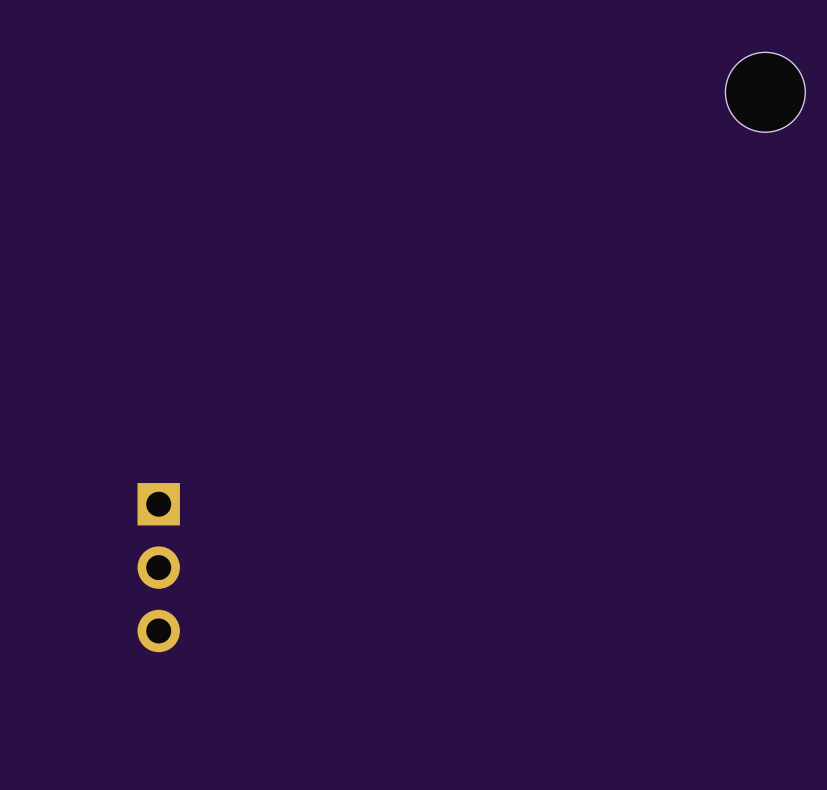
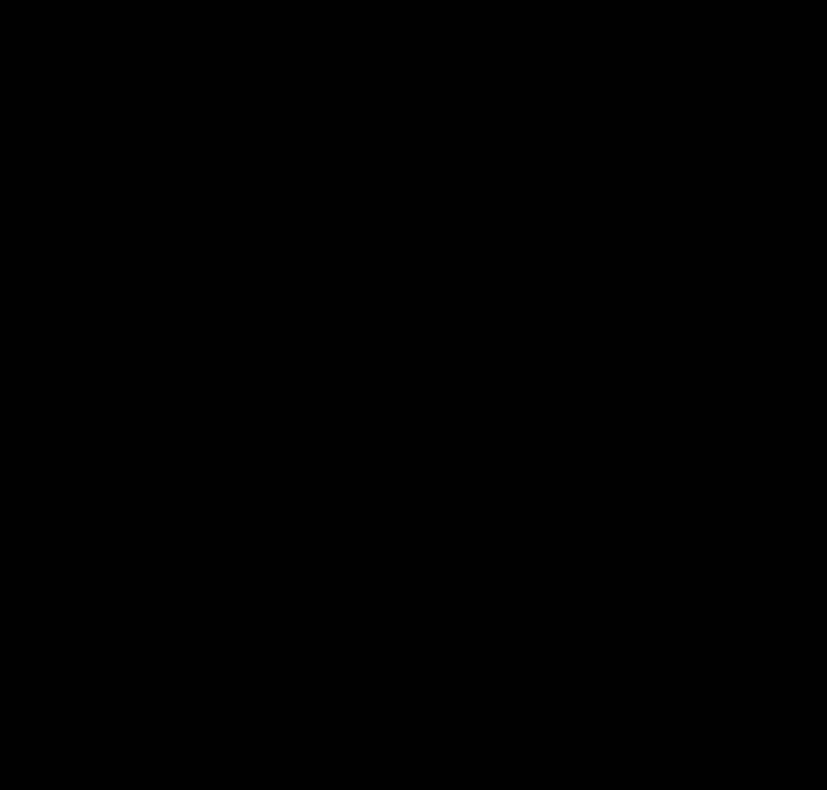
part: (765, 92) -> none
part: (158, 567) -> none

